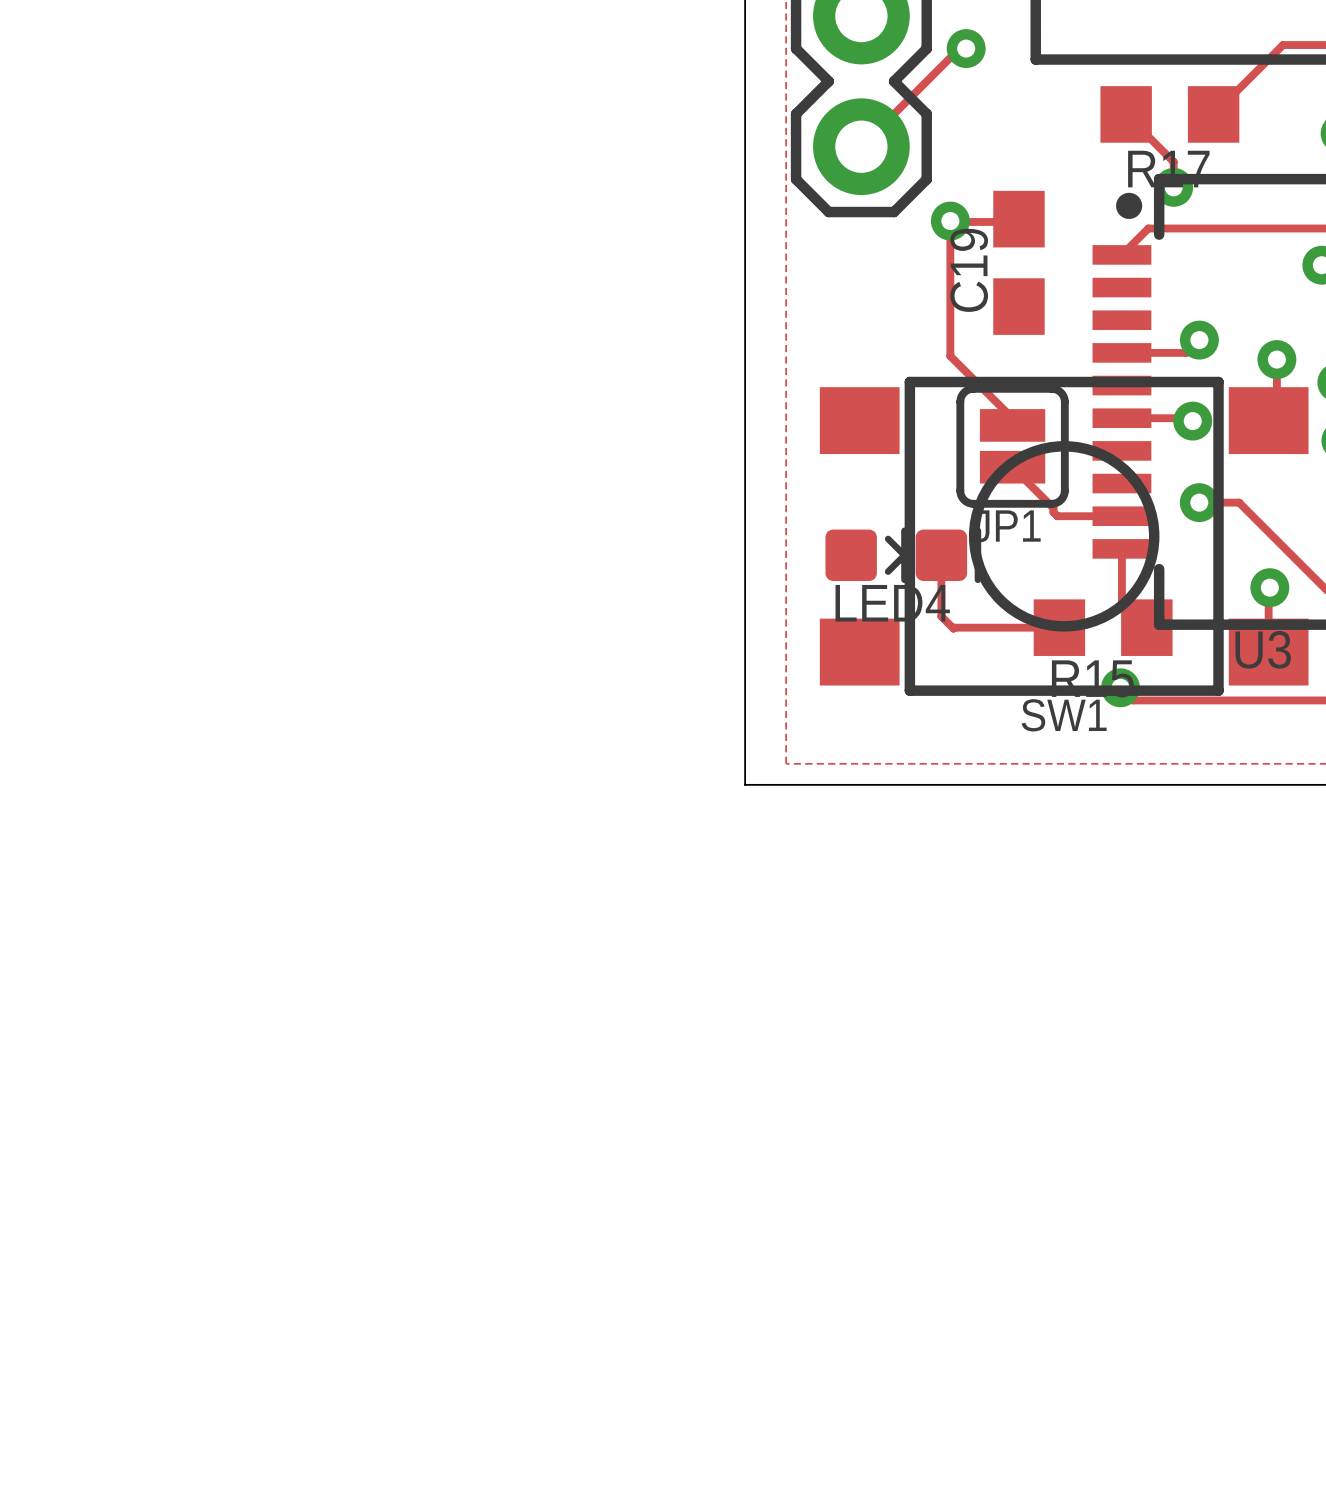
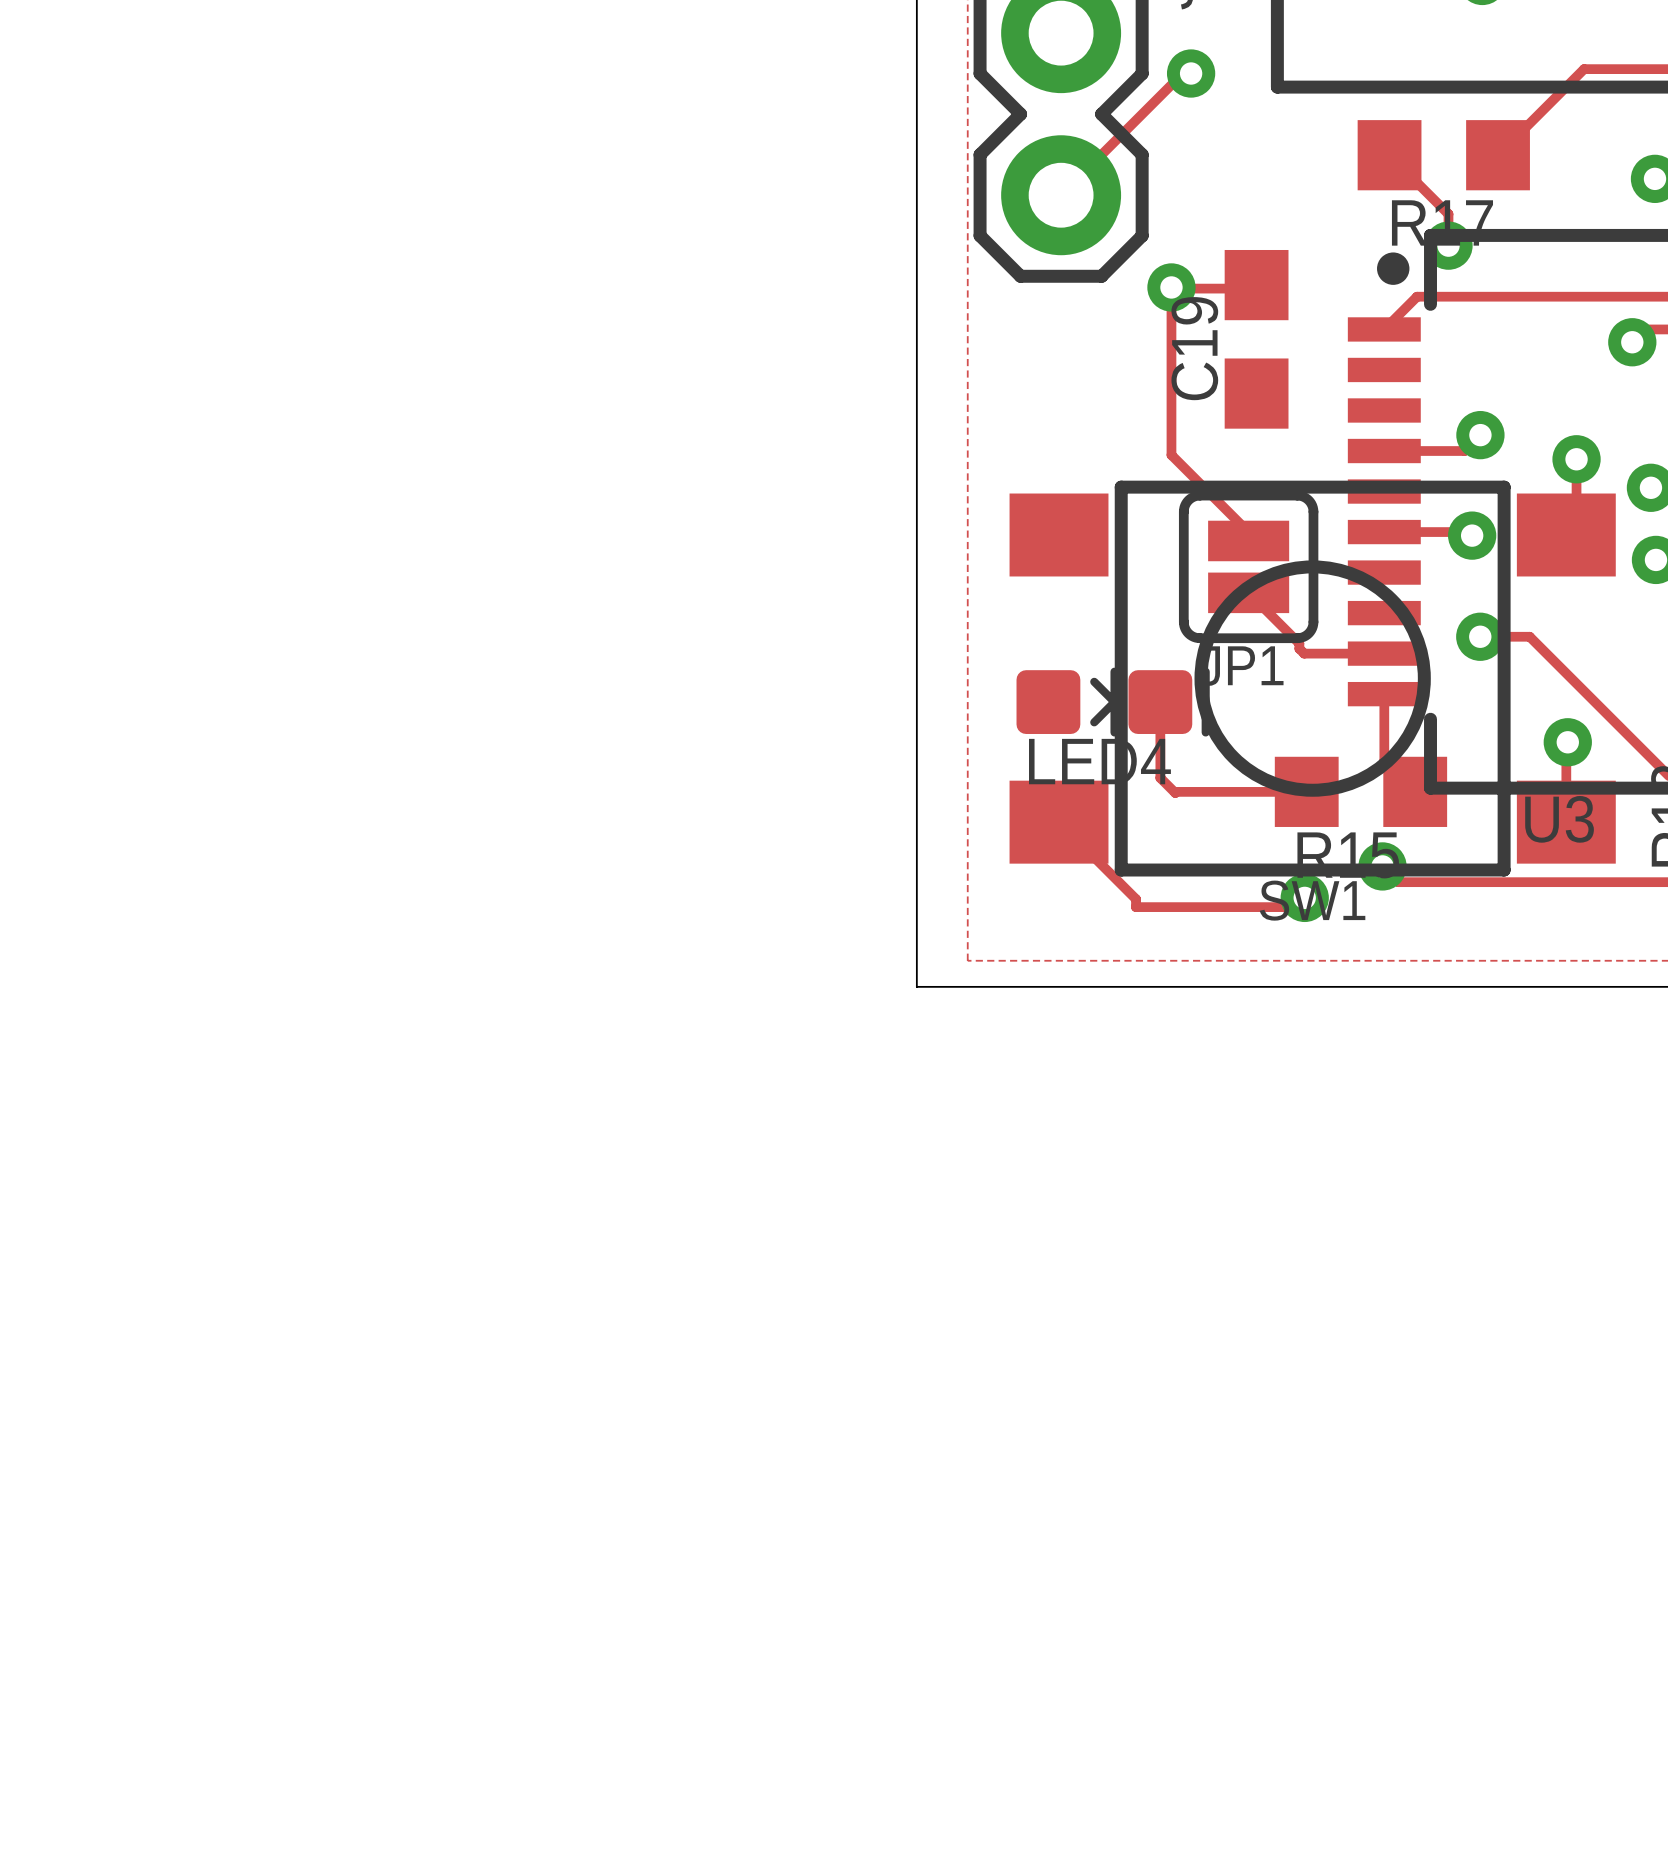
track: none -> (1059, 822) (1135, 899) (1135, 907) (1295, 907) (1304, 897)
via: none -> (1304, 897)

